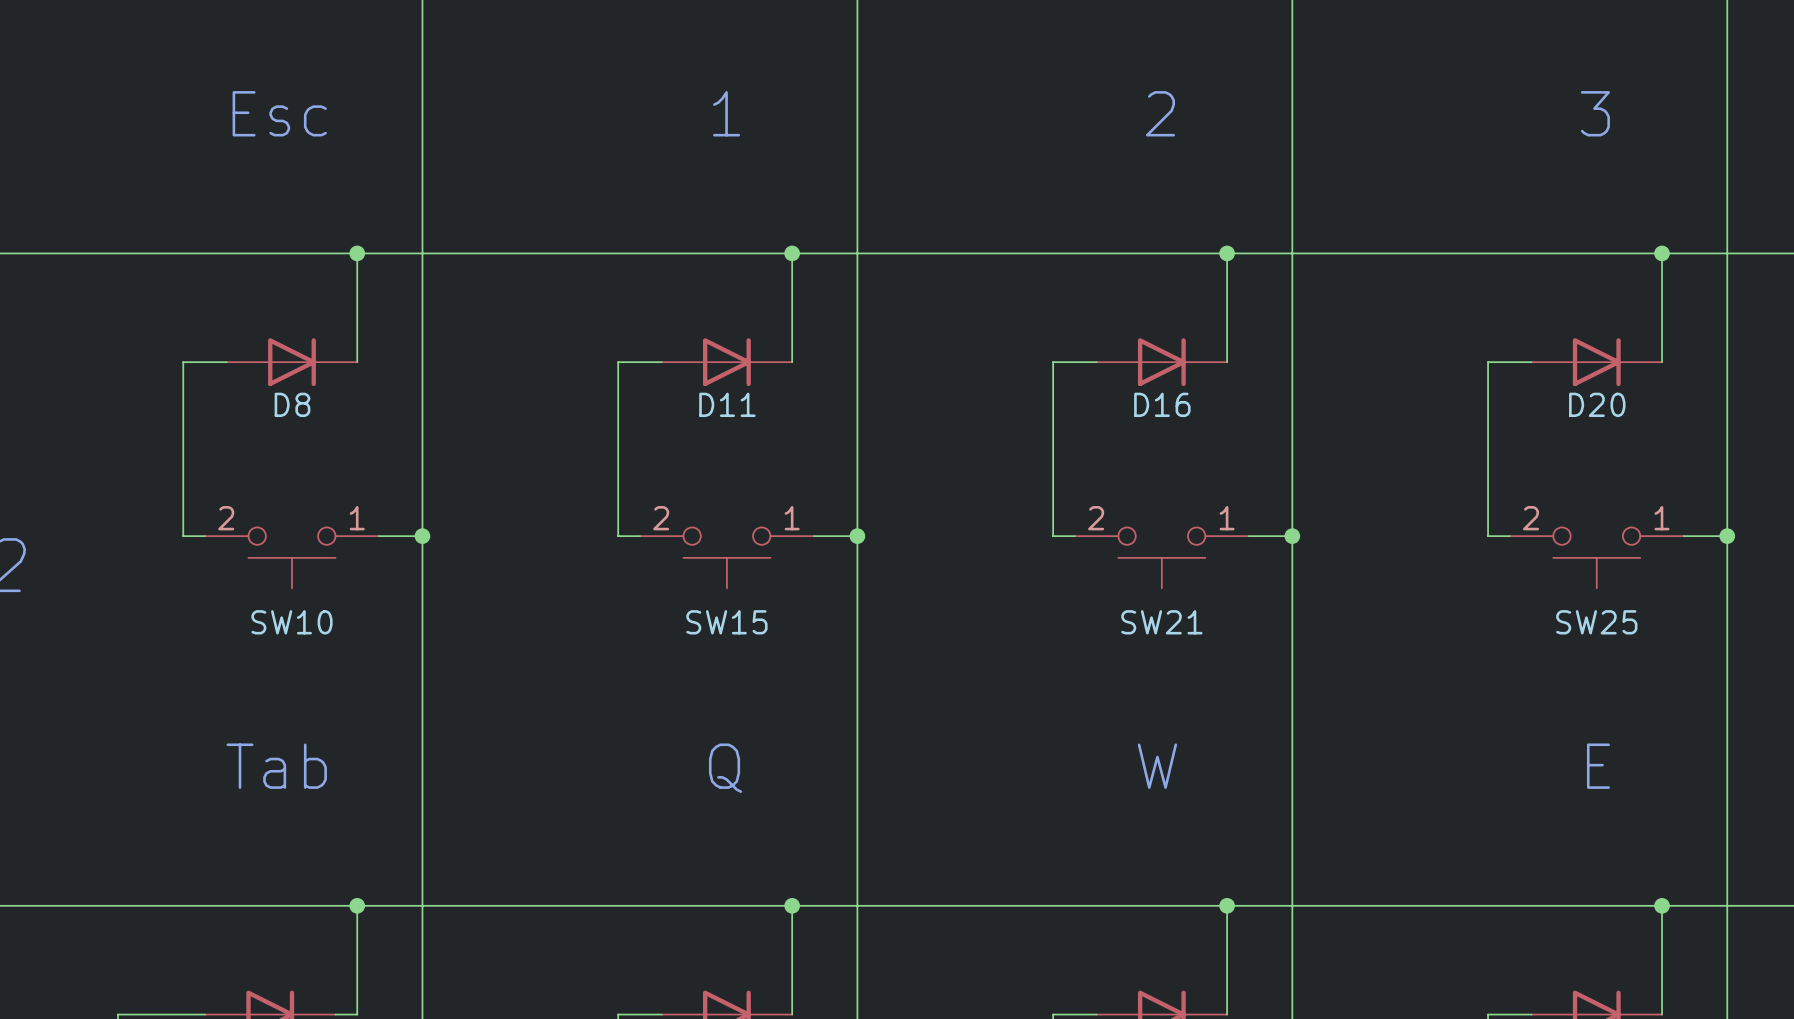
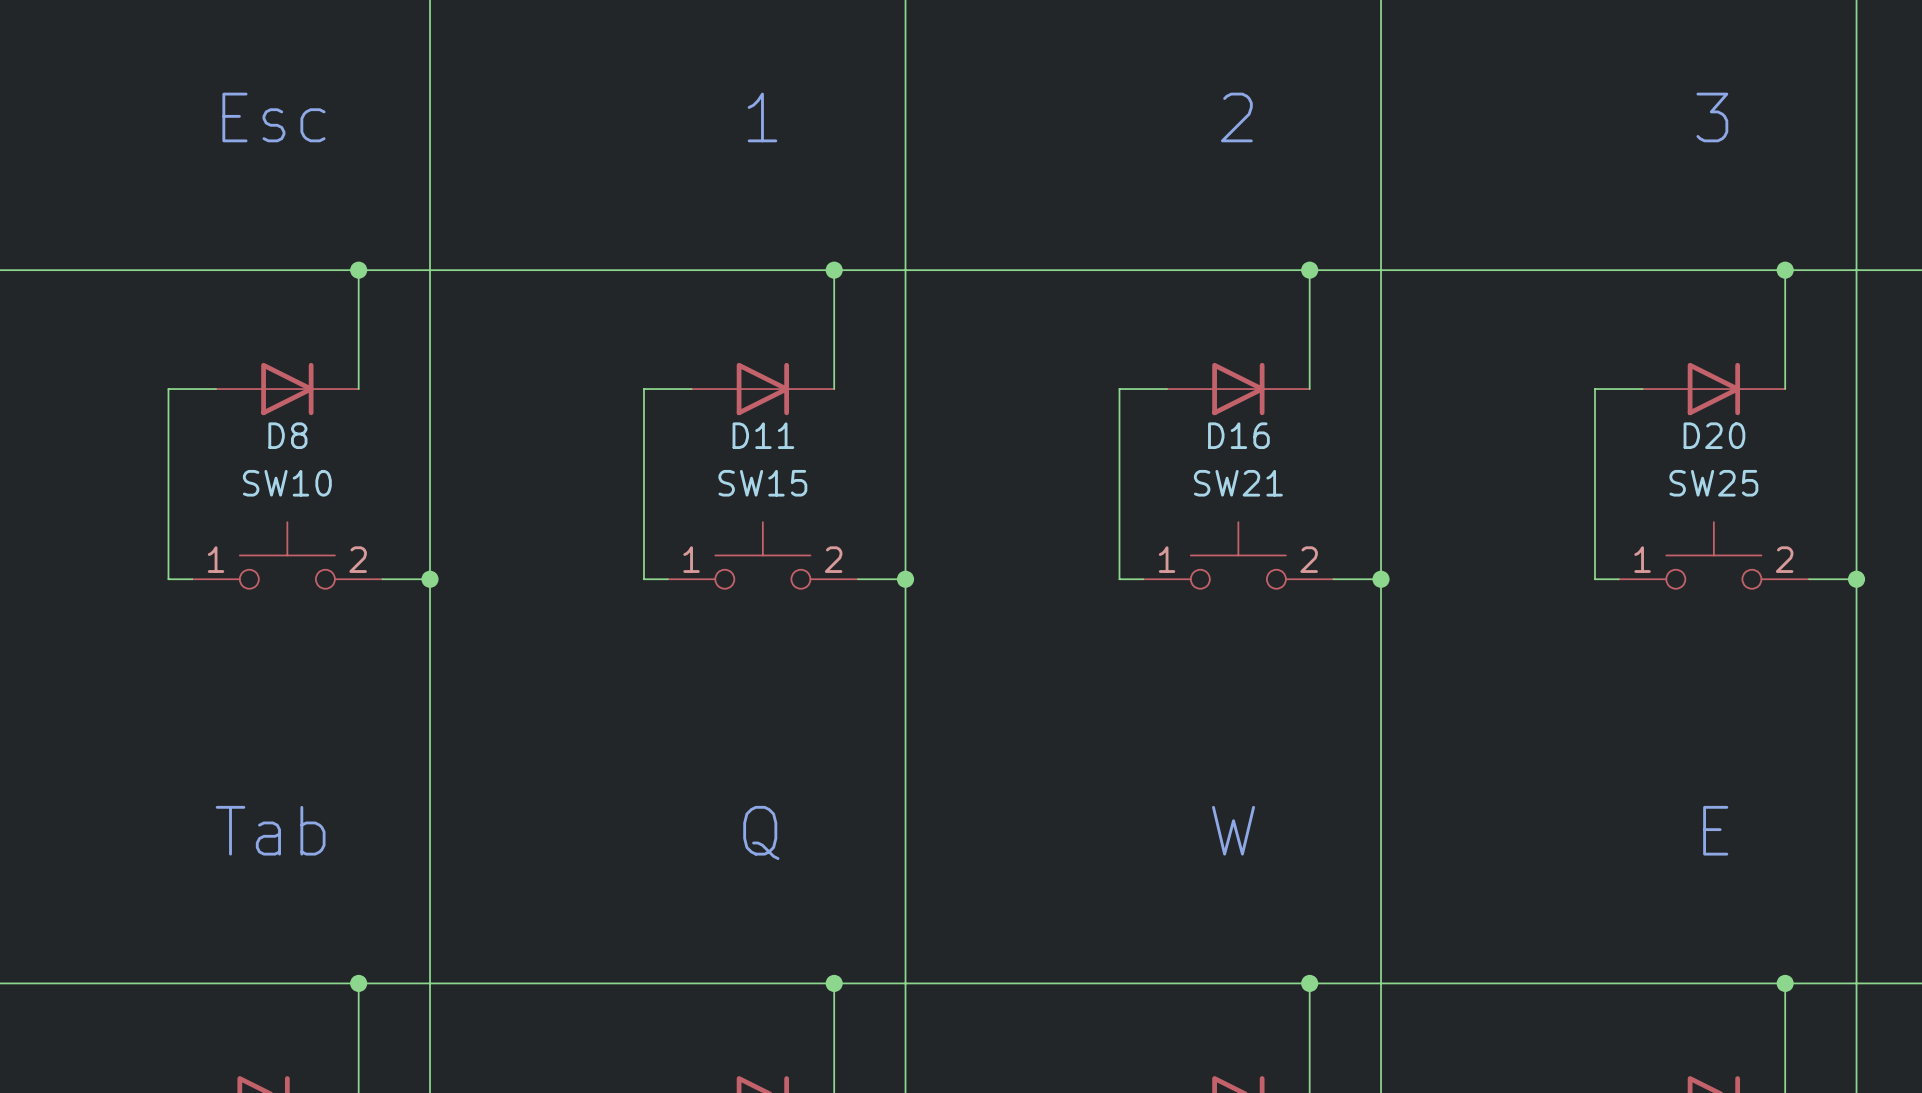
SW10 rotation: 0° (291, 557) -> 180° (287, 555)
SW15 rotation: 0° (726, 557) -> 180° (762, 555)
SW21 rotation: 0° (1161, 557) -> 180° (1238, 555)
SW25 rotation: 0° (1596, 557) -> 180° (1713, 555)

